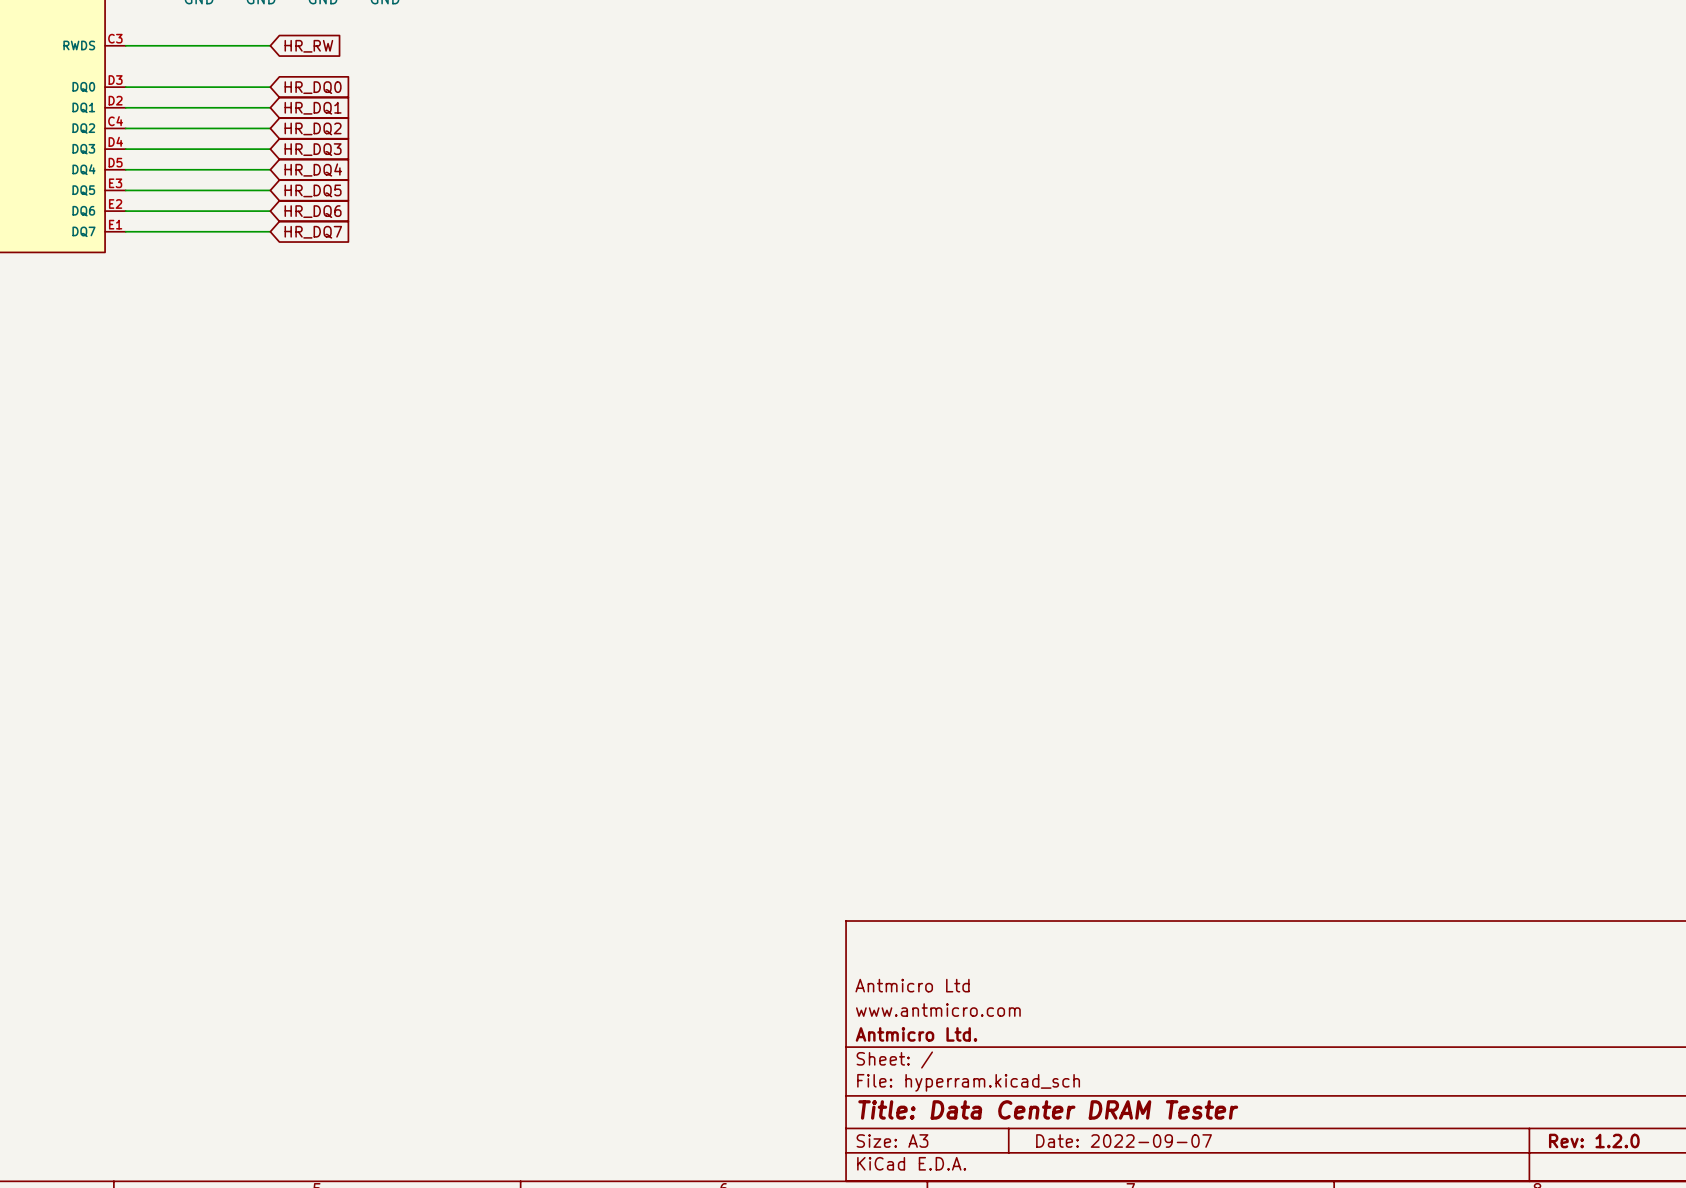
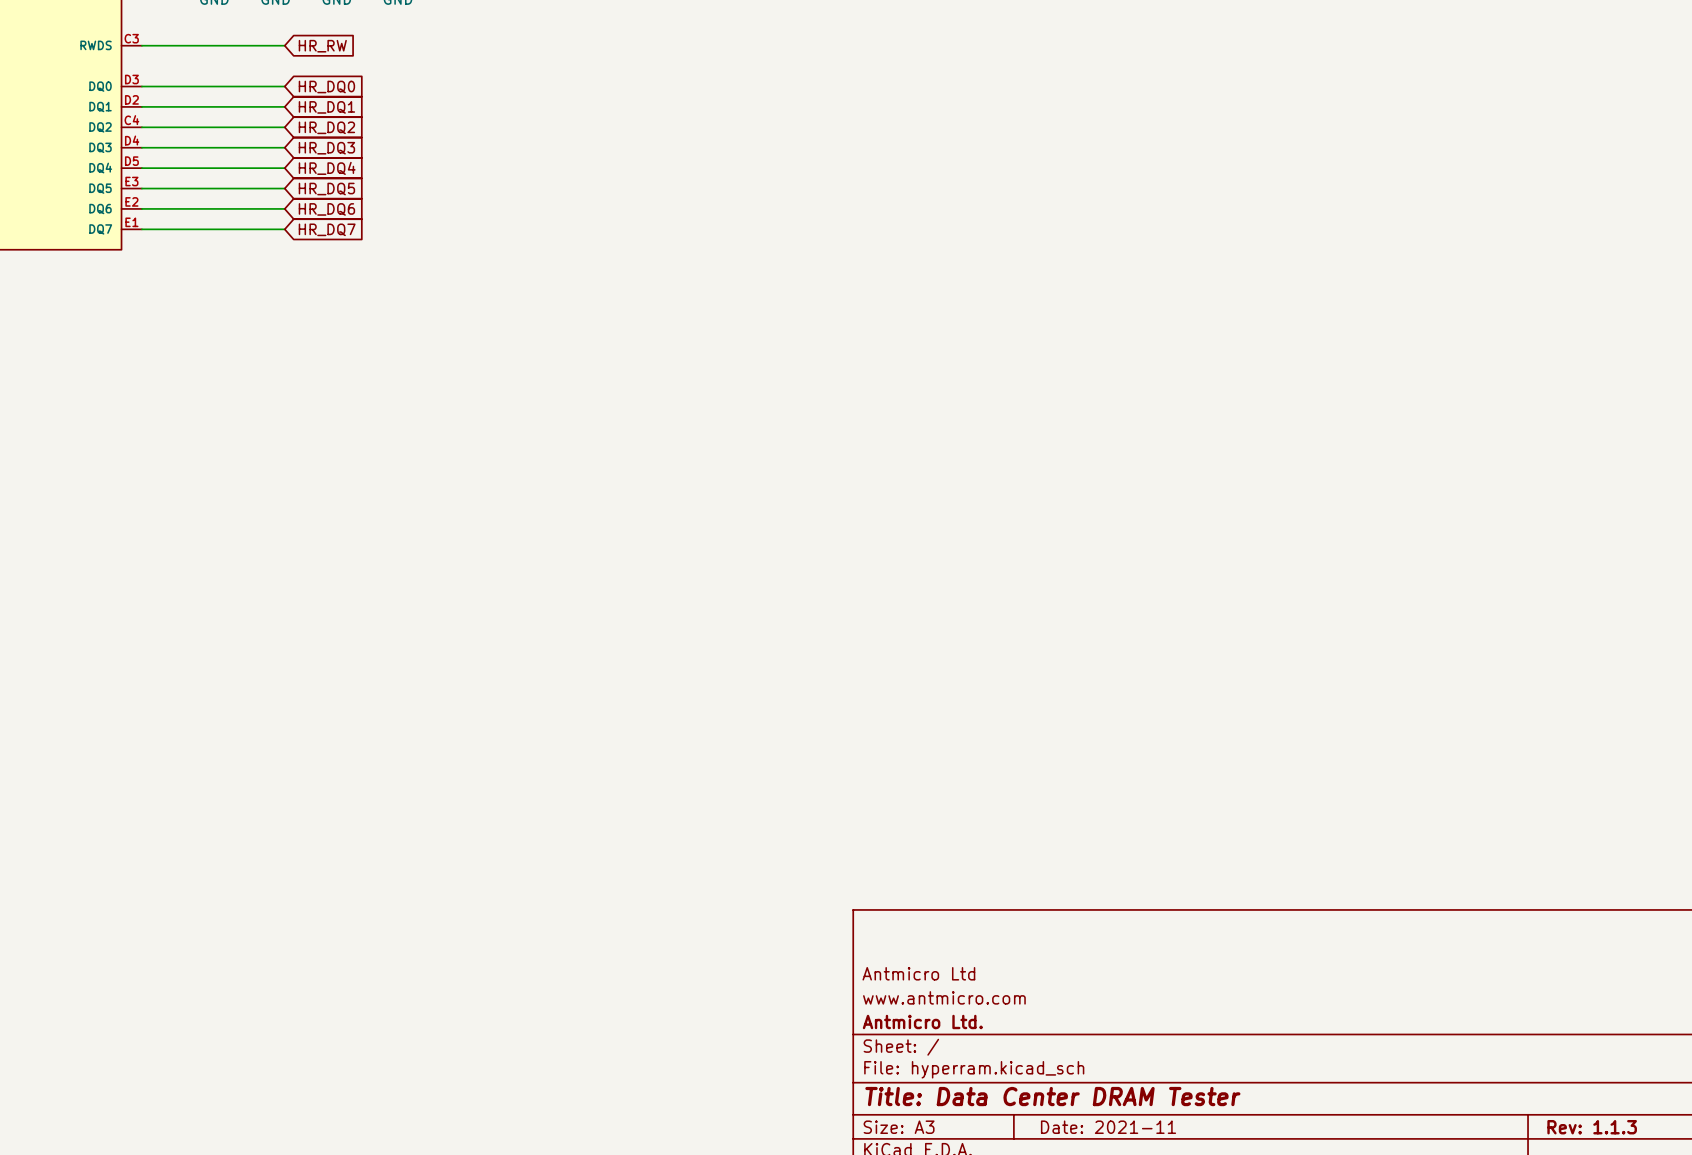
title block: Date: 2022-09-07 (1124, 1141) -> Date: 2021-11 (1108, 1127)
title block: Rev: 1.2.0 (1594, 1141) -> Rev: 1.1.3 (1592, 1127)

